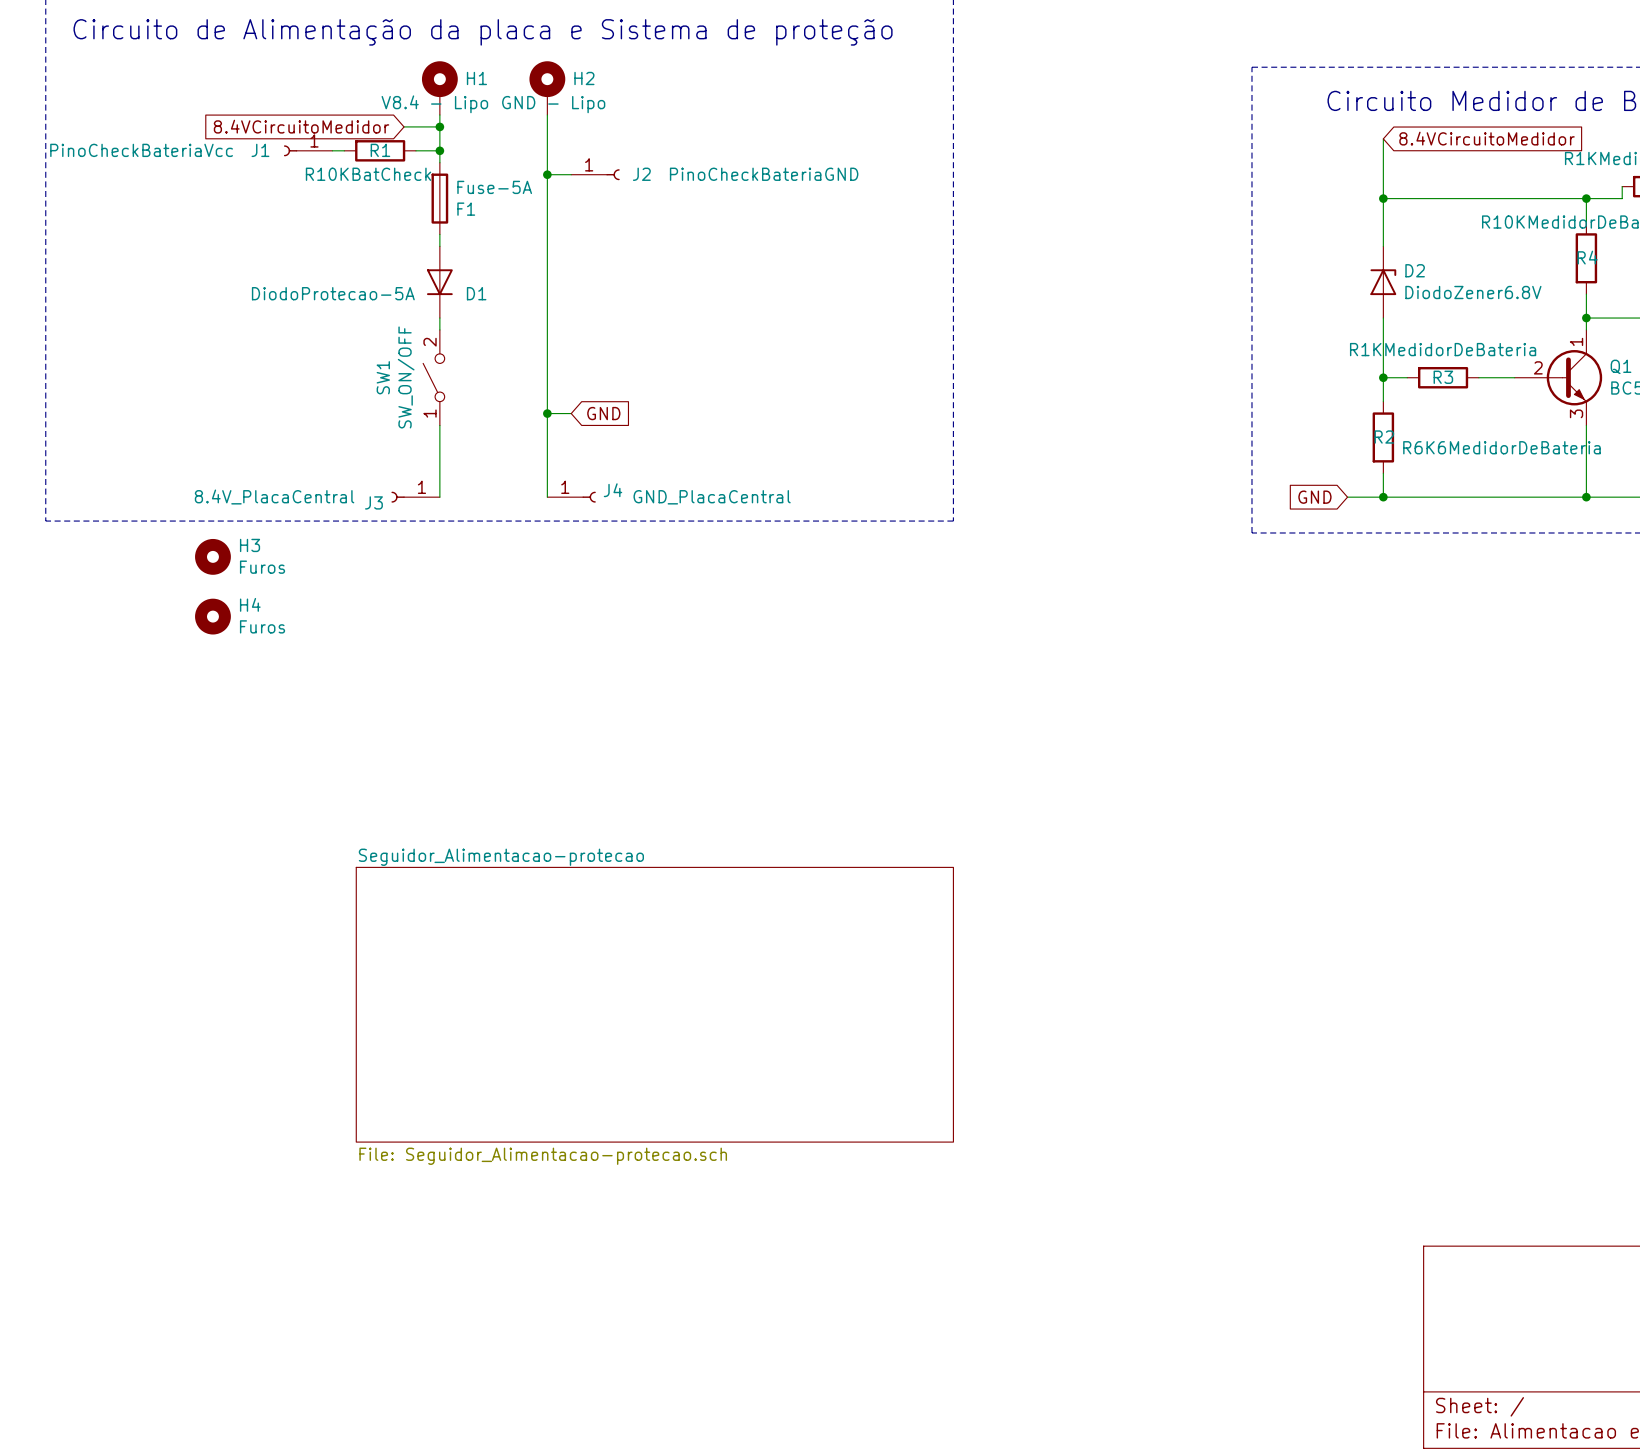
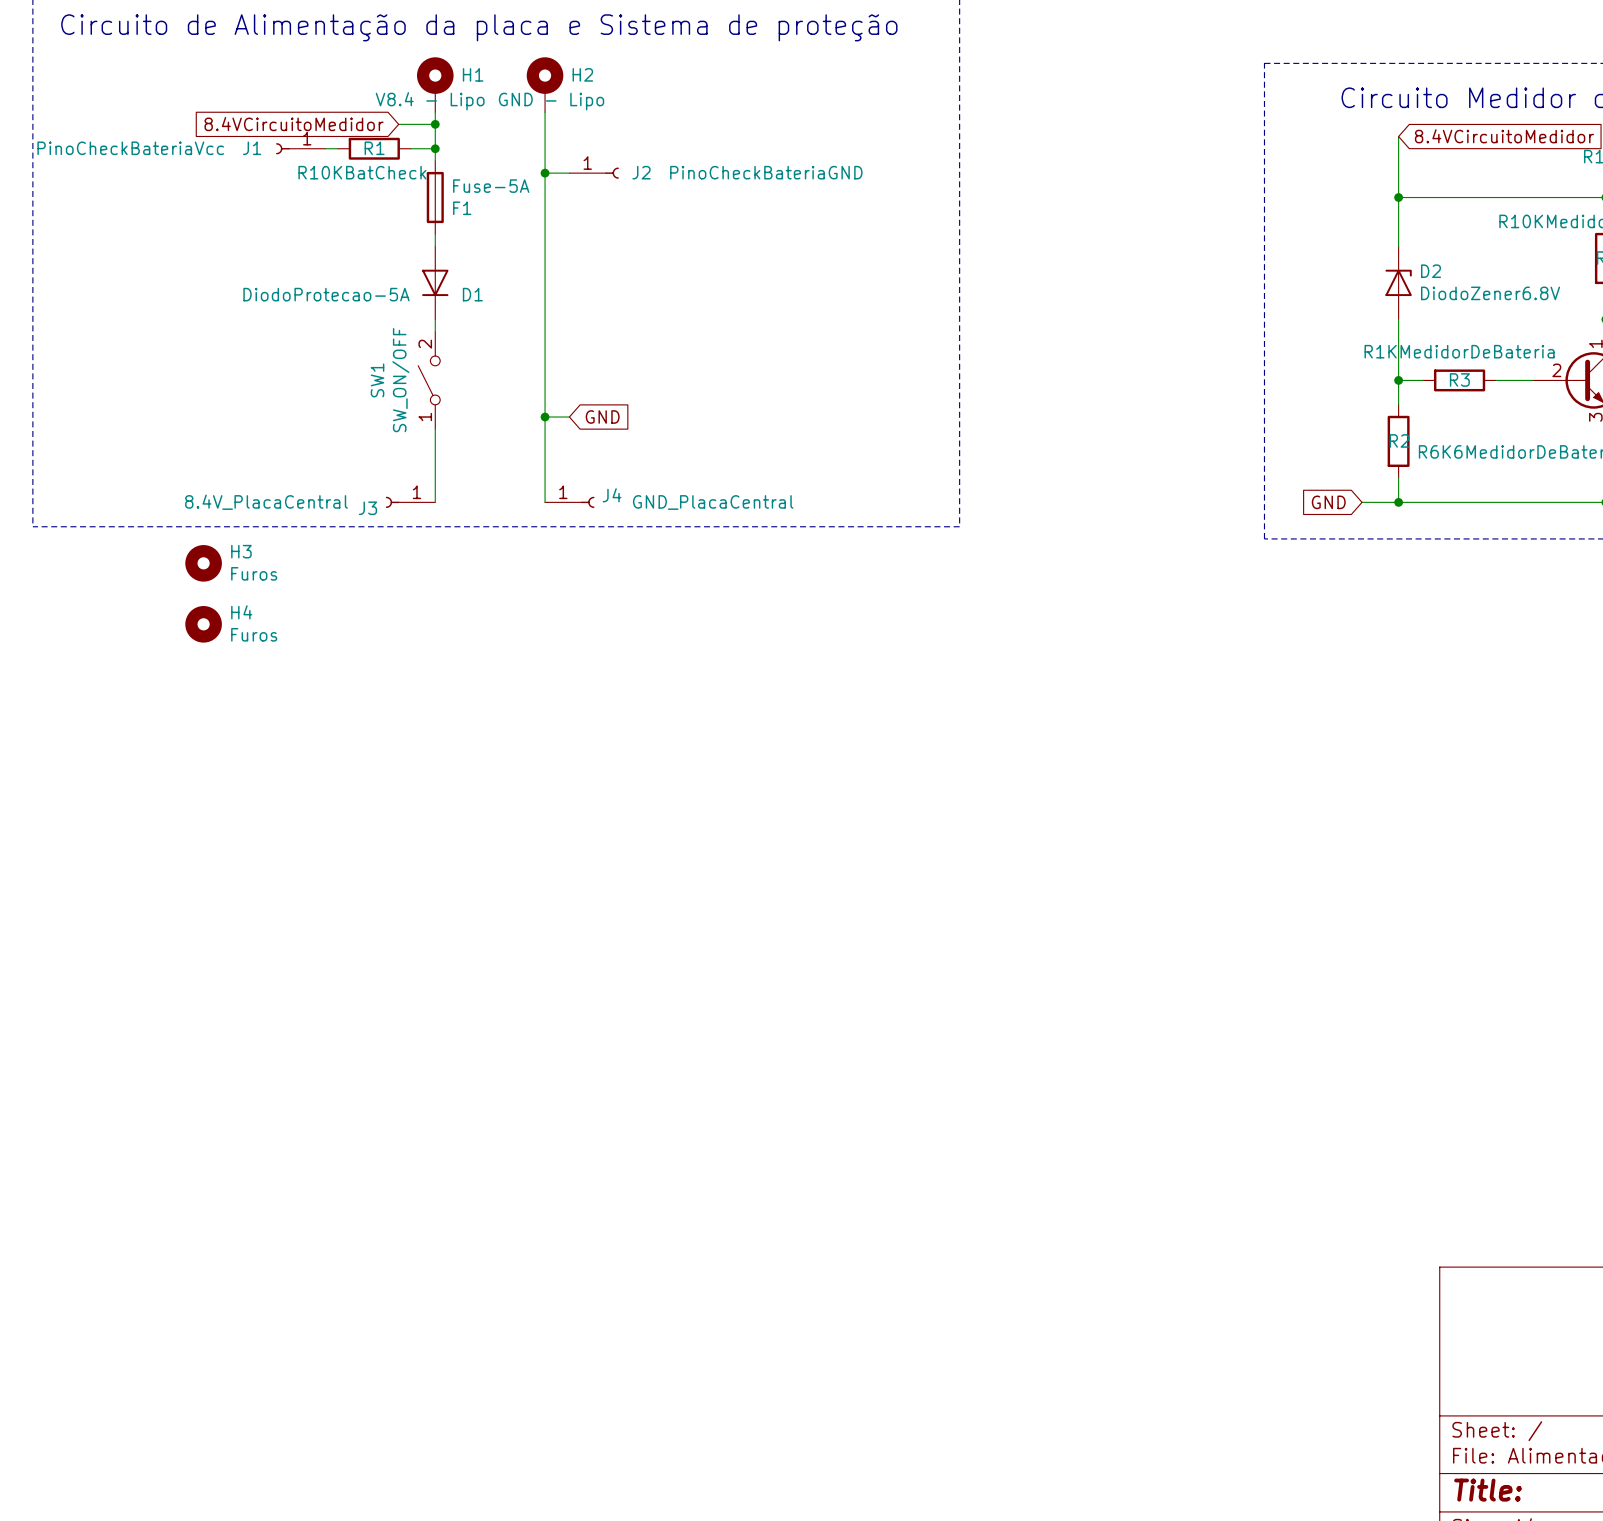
sheet Seguidor_Alimentacao-protecao: File: Seguidor_Alimentacao-protecao.sch (654, 1004) -> none

